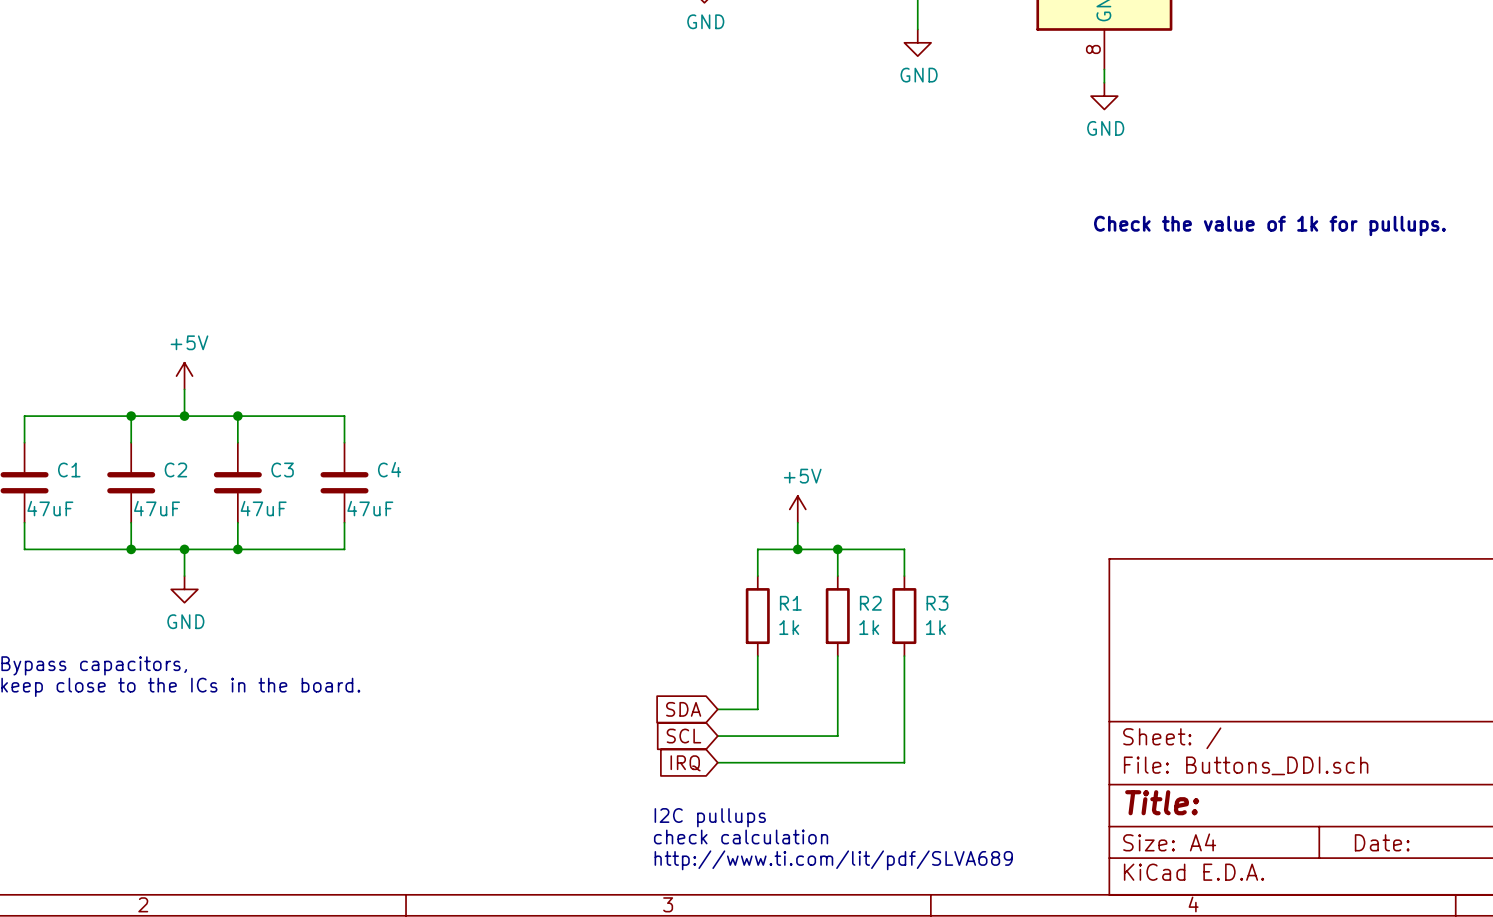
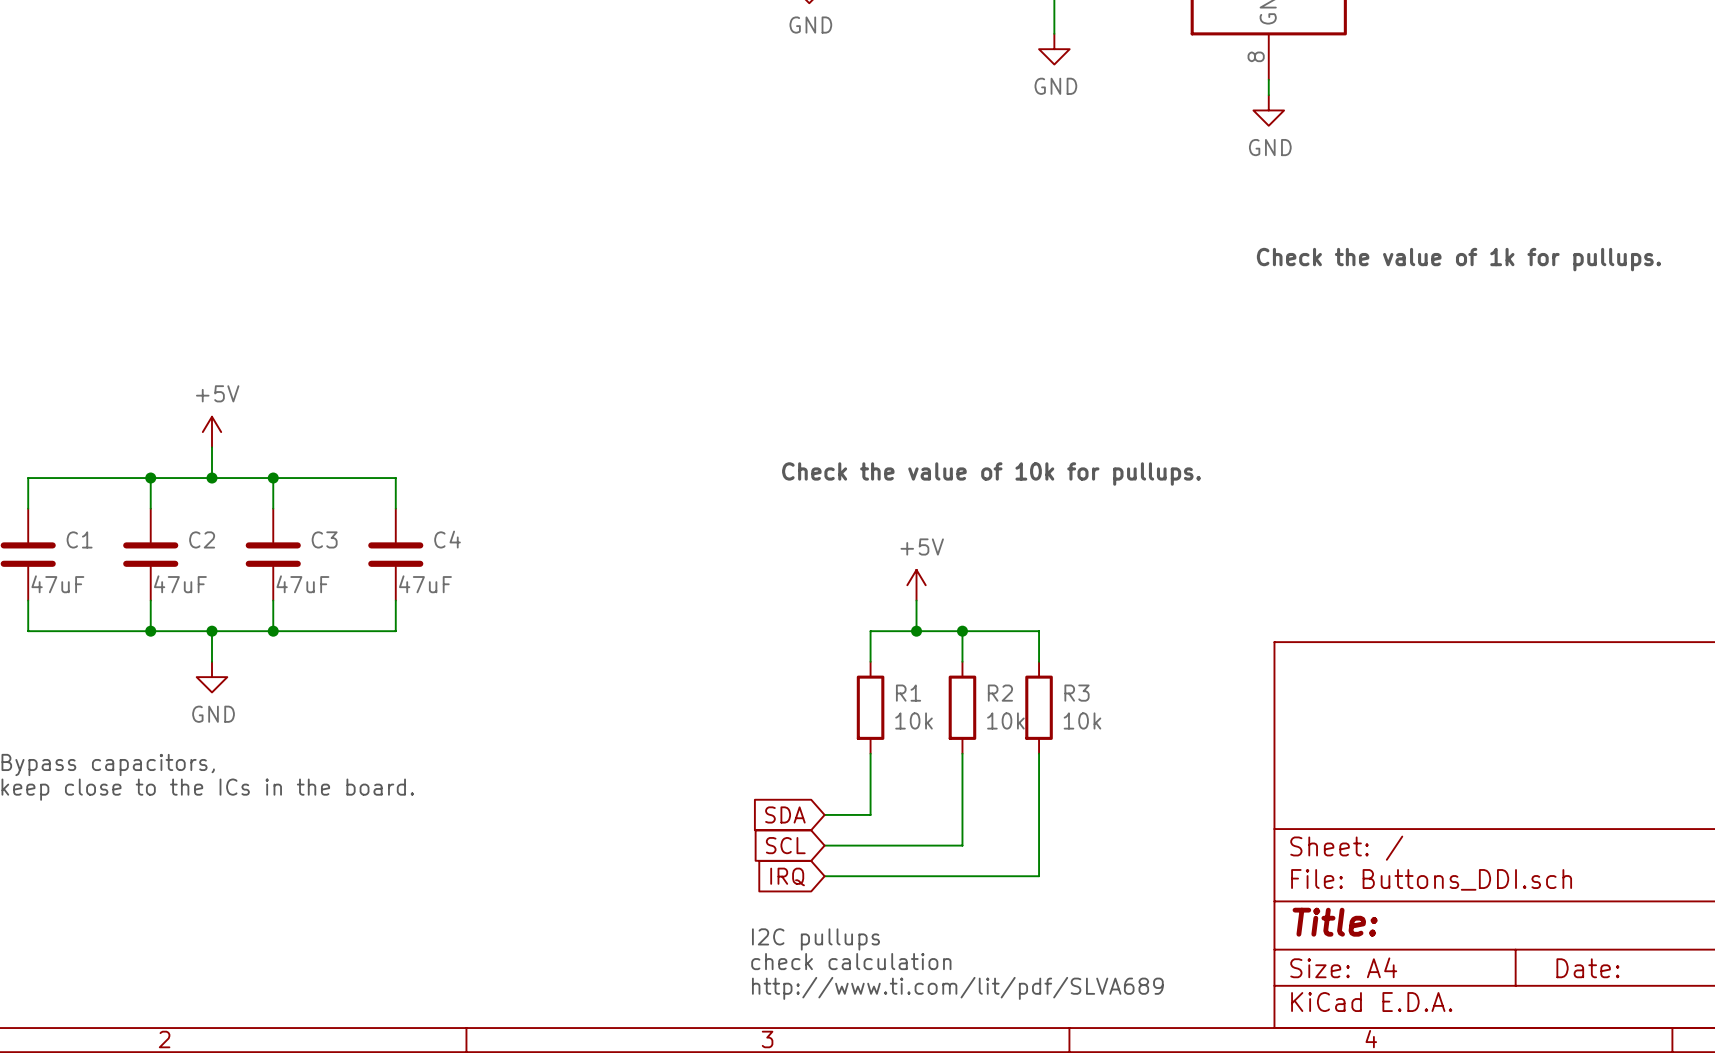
text: none -> Check the value of 10k for pullups. (991, 474)
R1 value: 1k (789, 627) -> 10k (914, 720)
R2 value: 1k (869, 627) -> 10k (1005, 720)
R3 value: 1k (935, 627) -> 10k (1082, 720)

